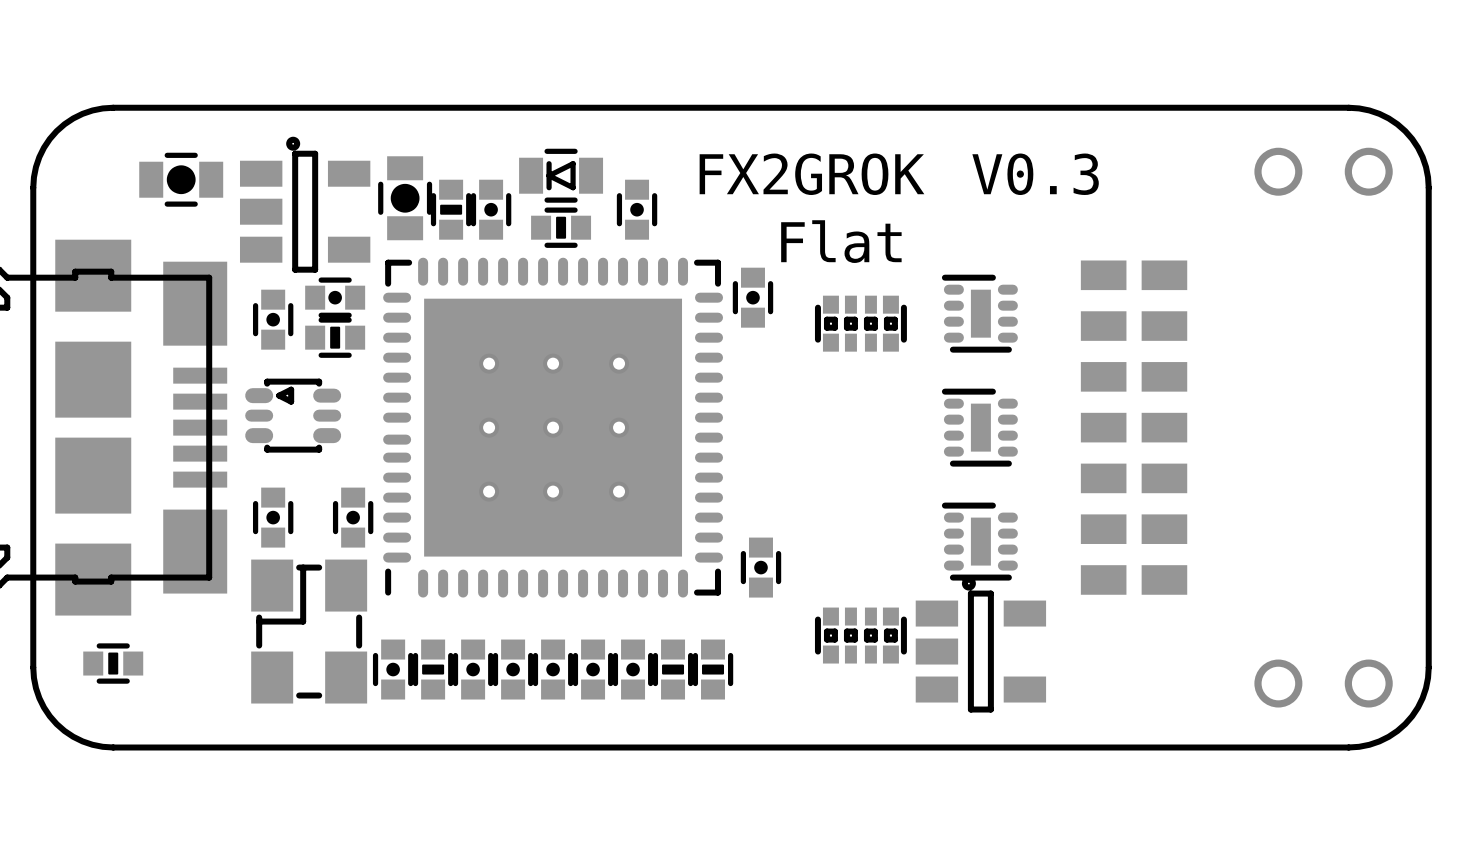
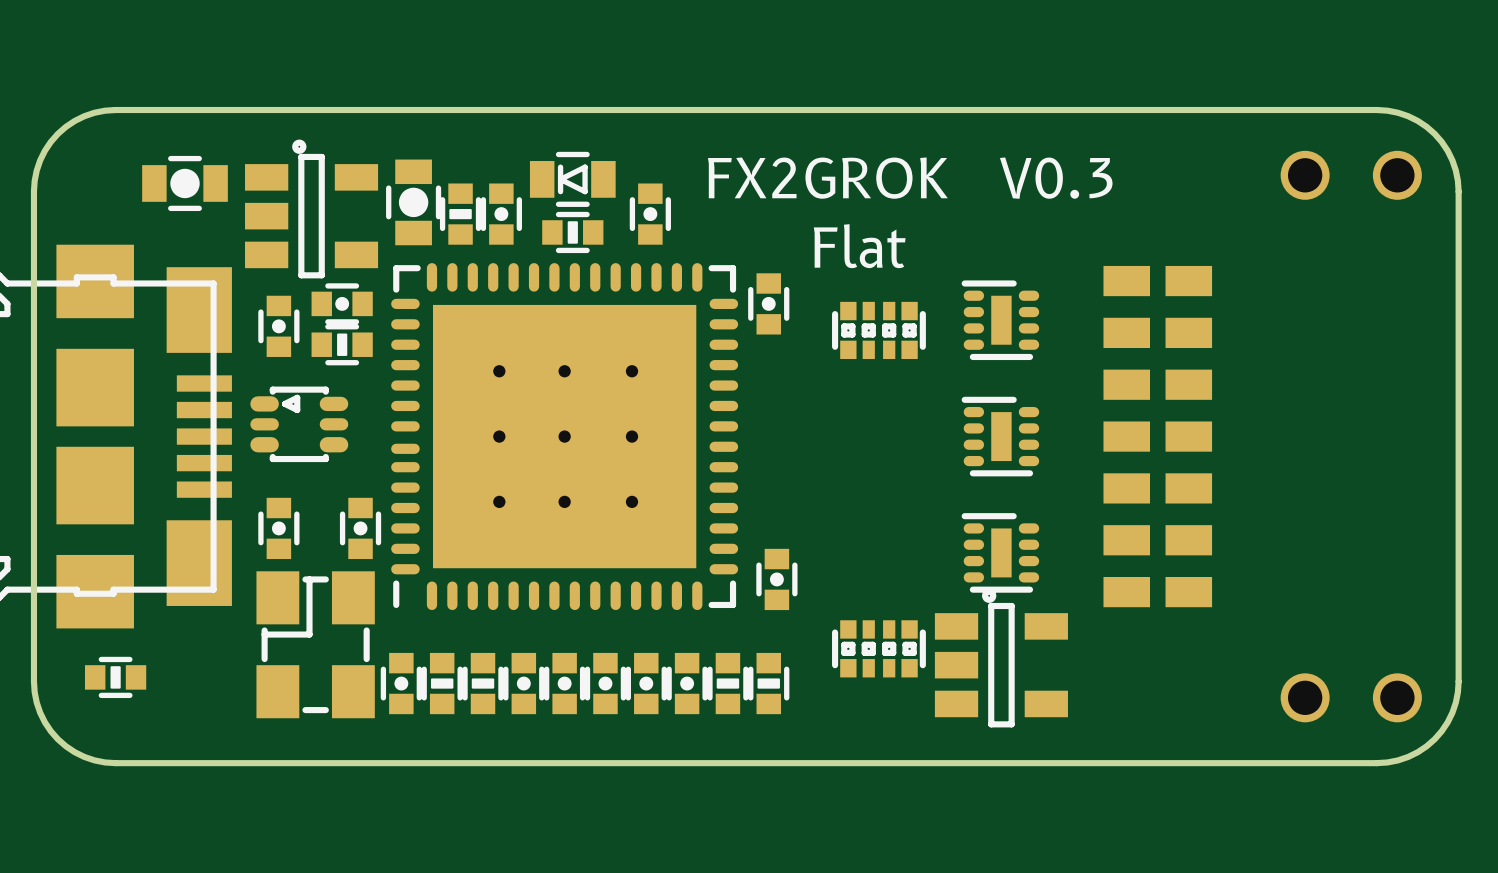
part footprint: [452, 639, 494, 700] -> [462, 652, 504, 715]
part footprint: [652, 639, 694, 700] -> [666, 652, 708, 715]
part: none -> (768, 683)

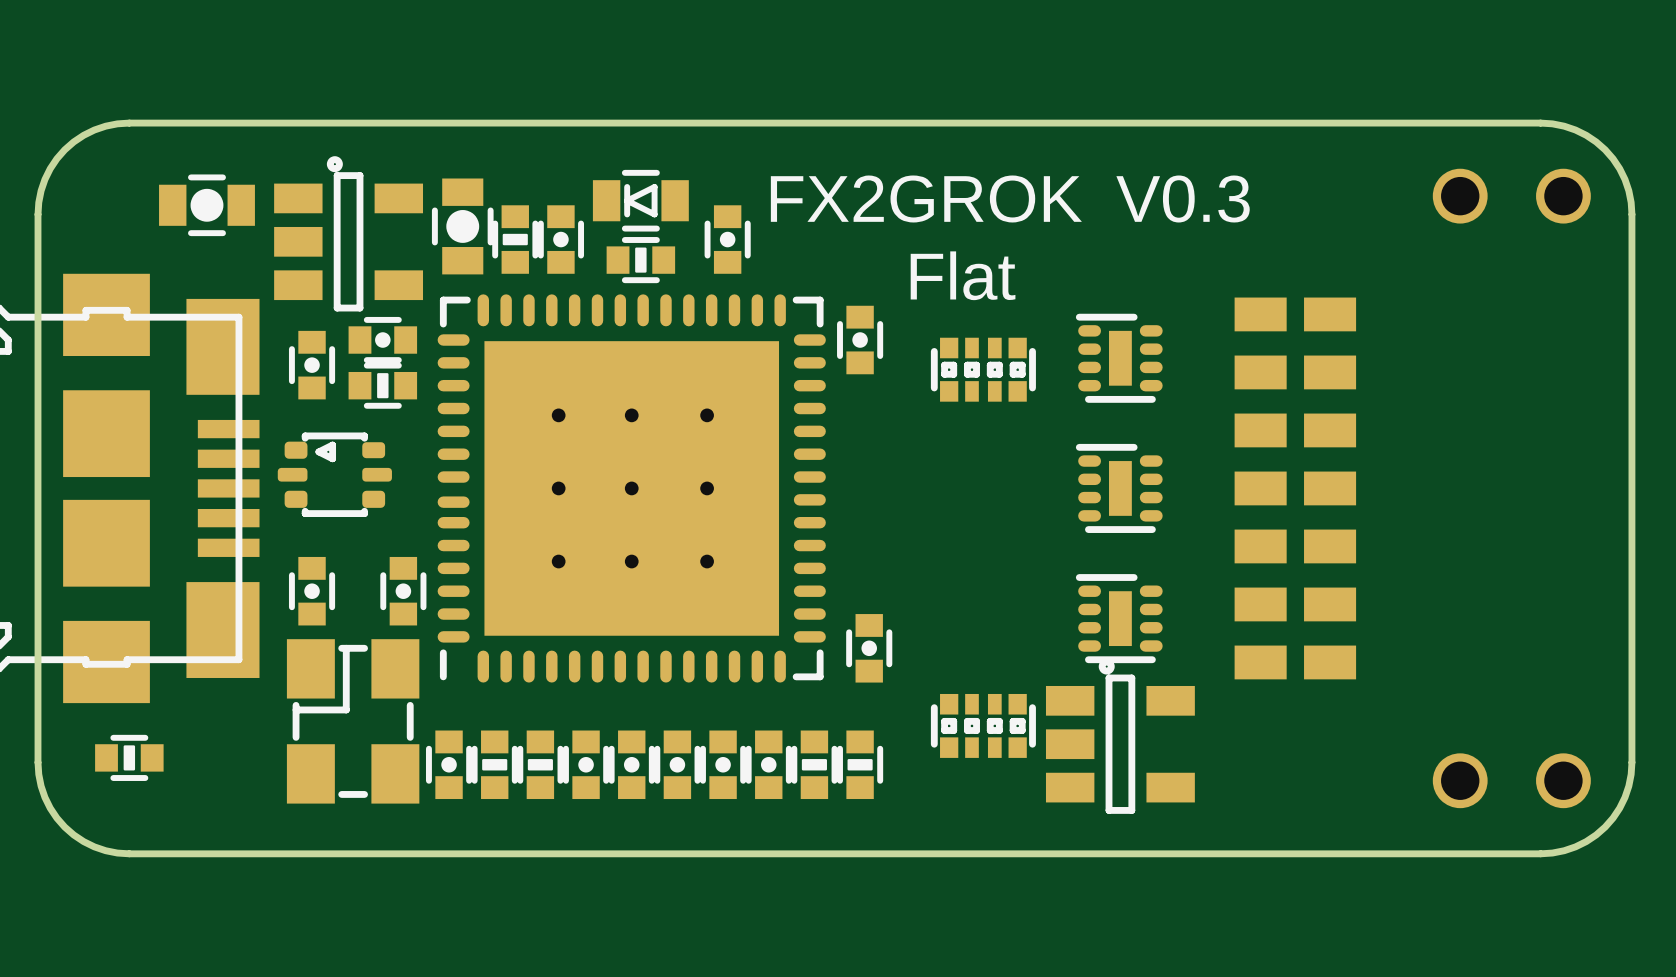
part footprint: [250, 386, 349, 463] -> [277, 432, 392, 517]

